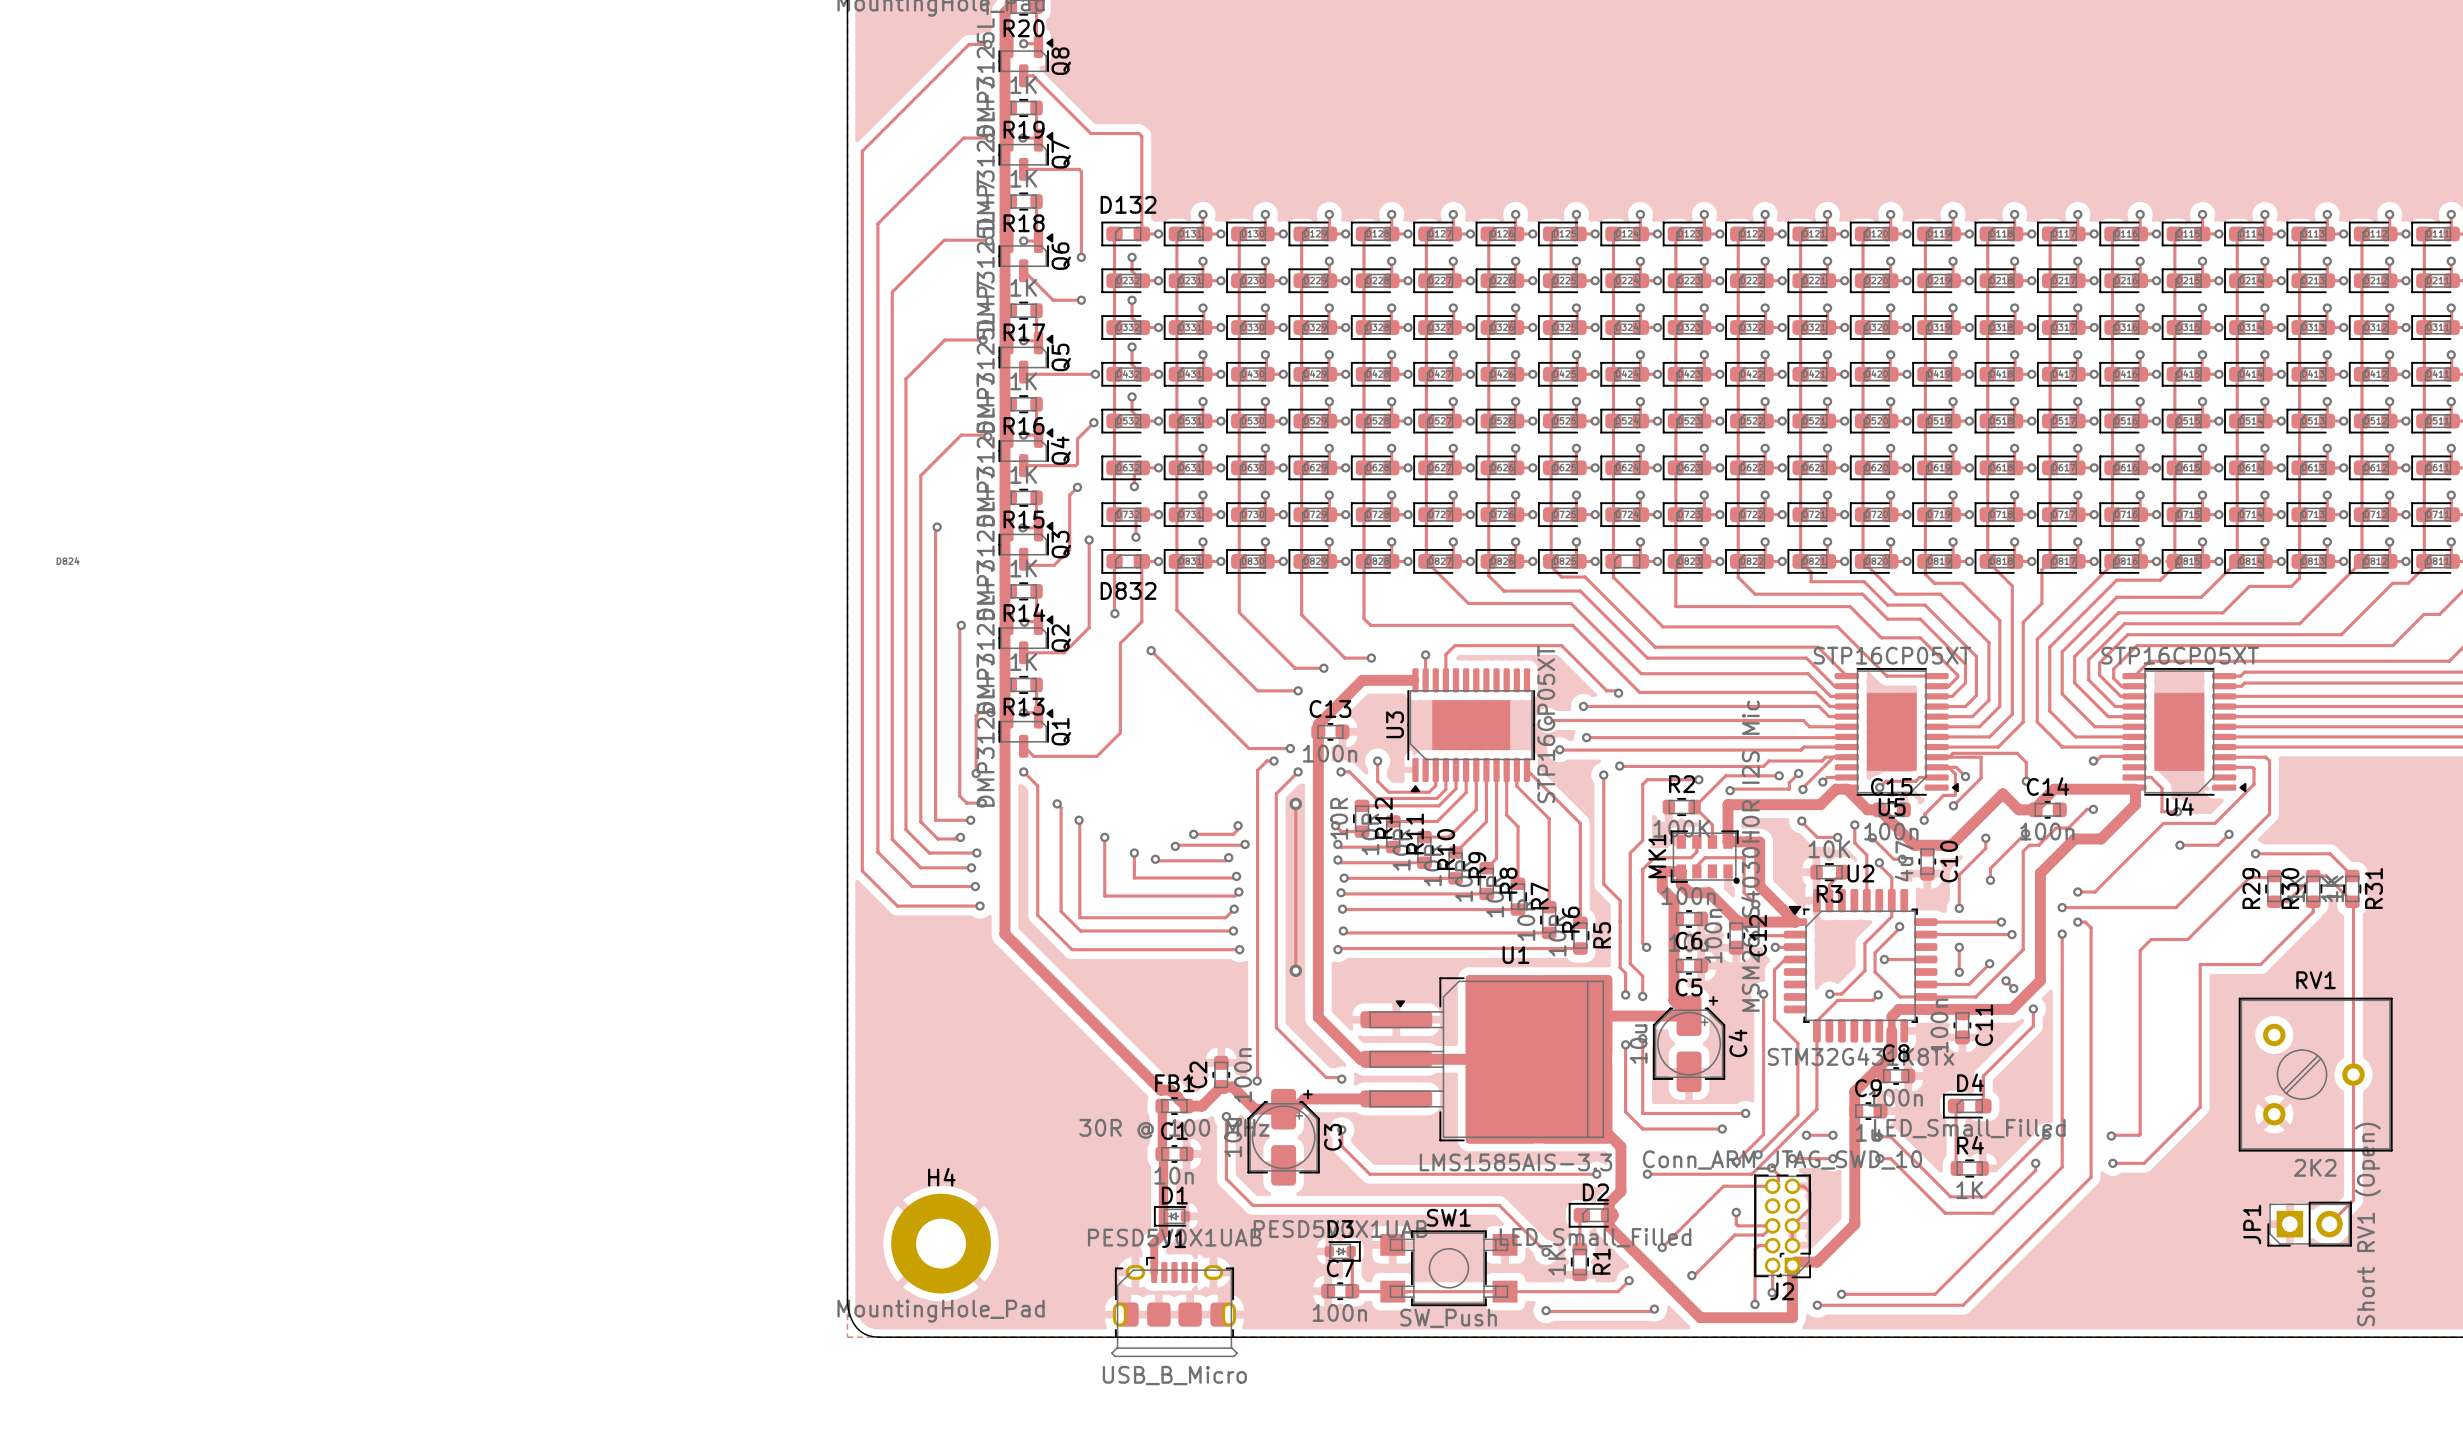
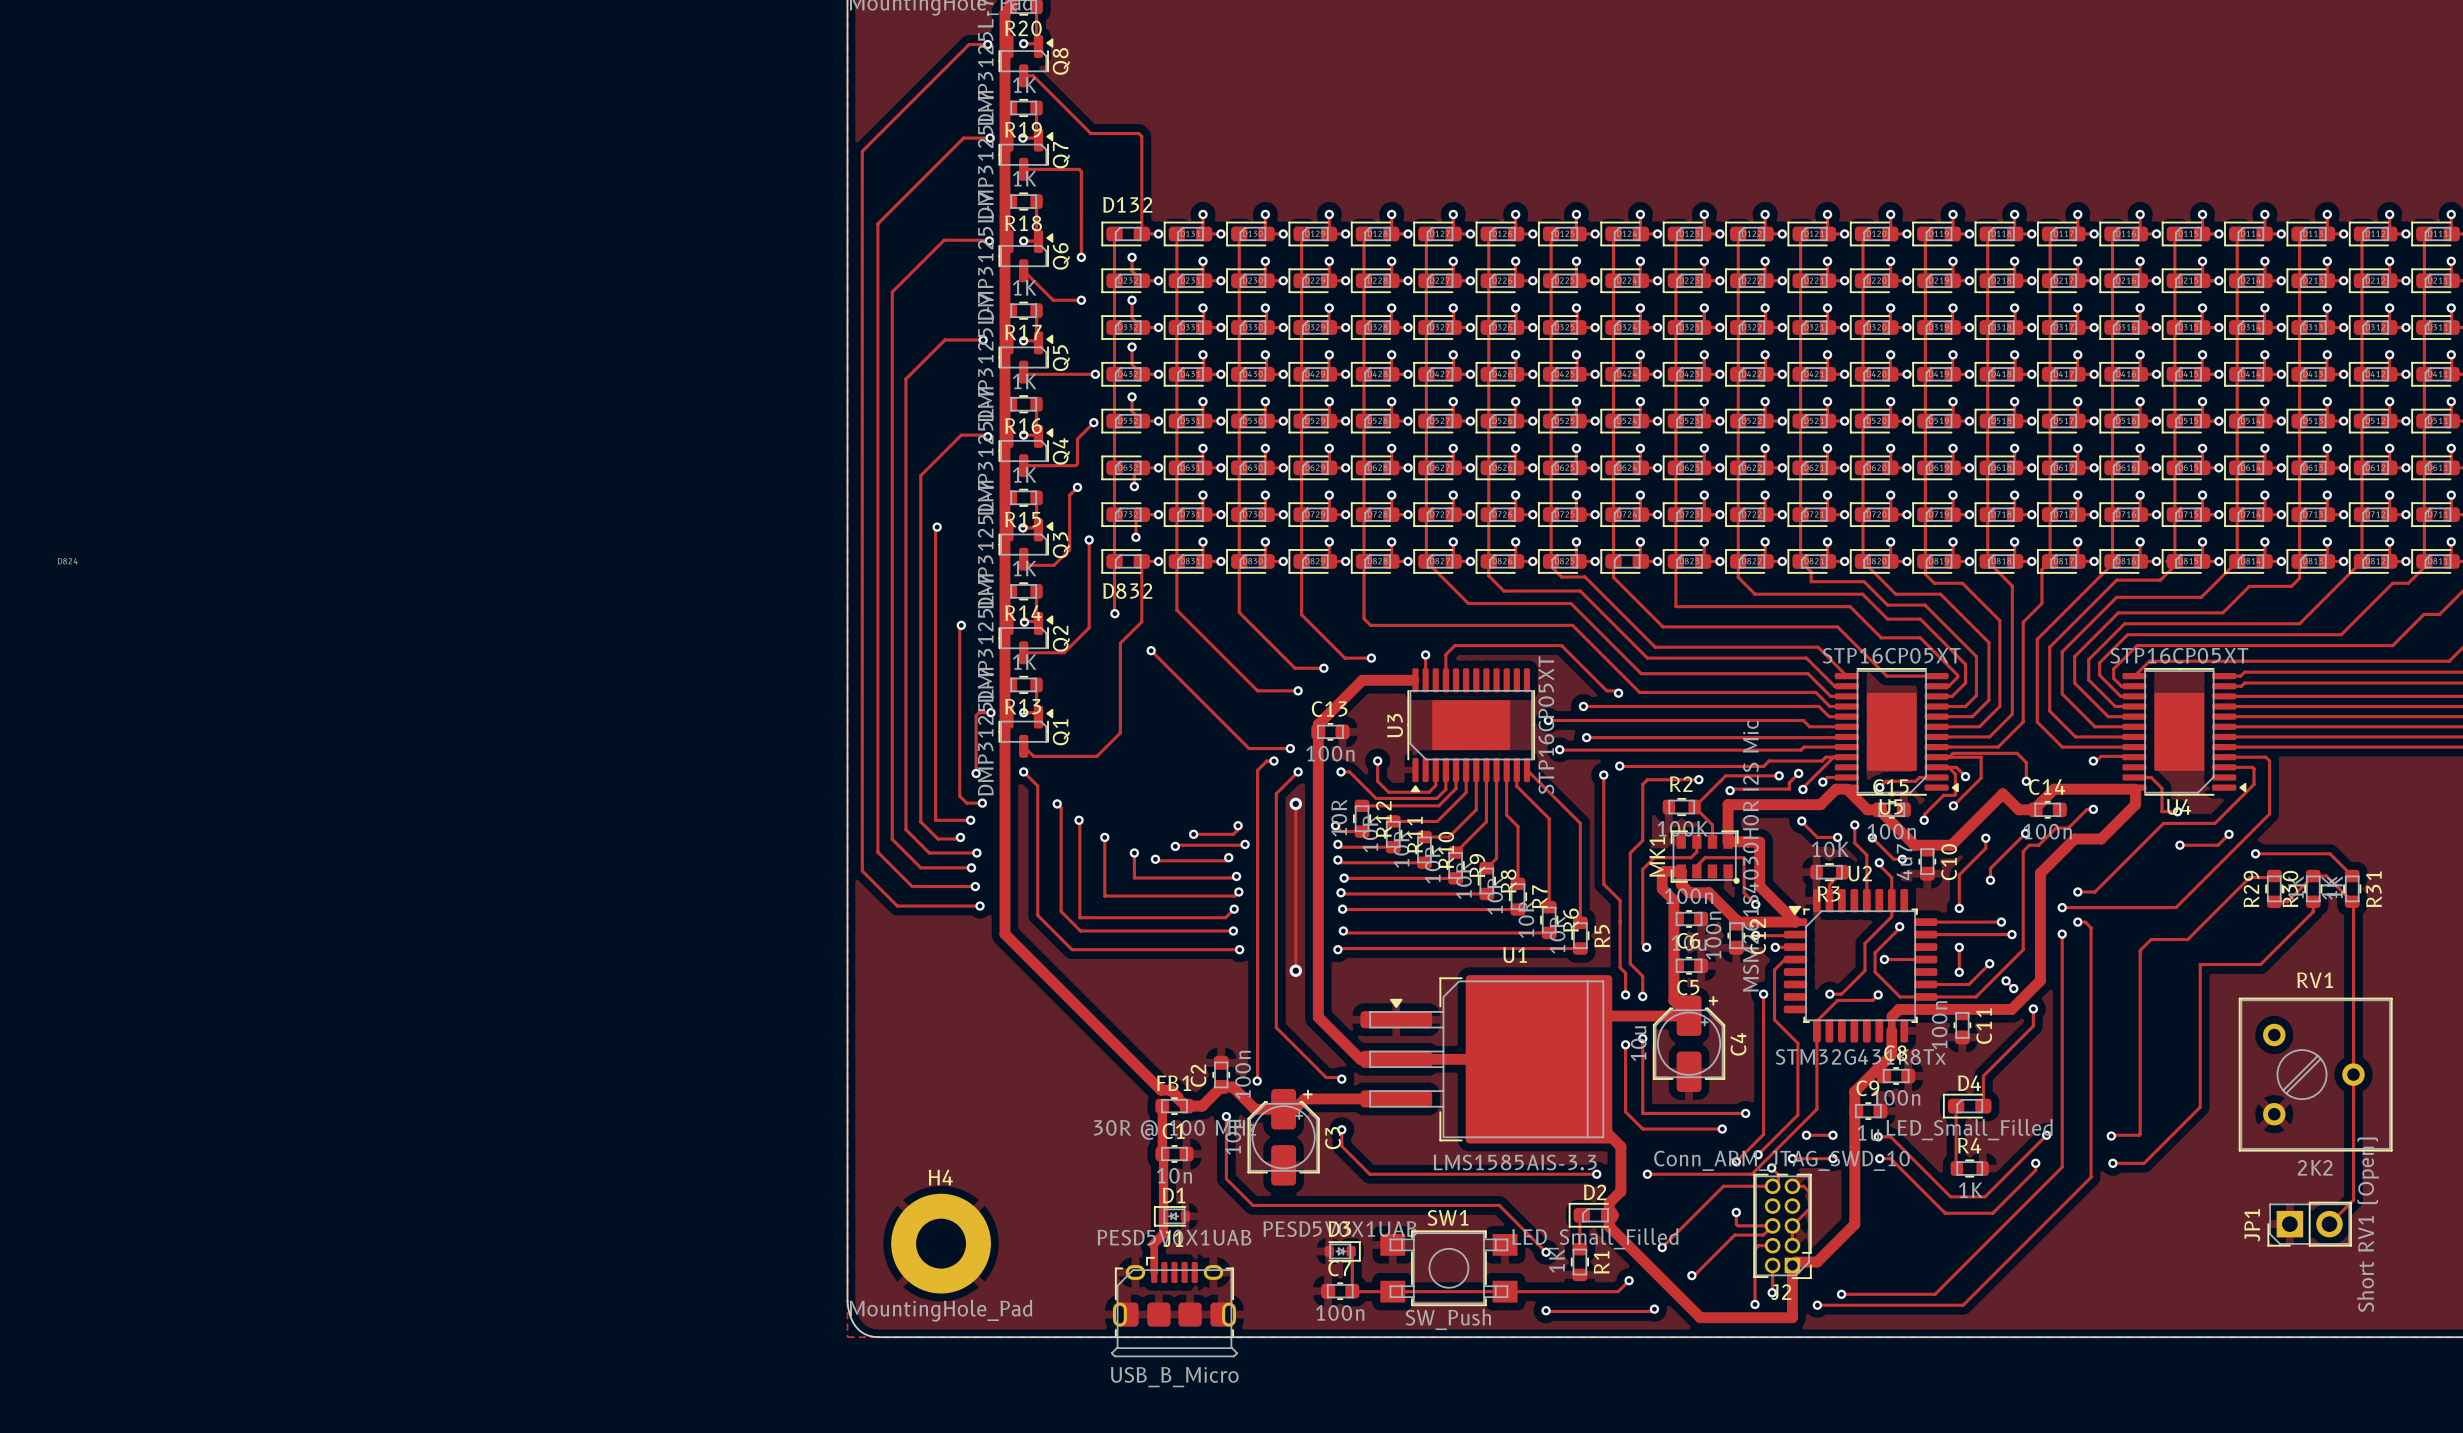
U1 footprint: [1360, 975, 1613, 1144] -> [1360, 975, 1613, 1144]
J2 footprint: [1754, 1174, 1812, 1279] -> [1753, 1173, 1812, 1280]

